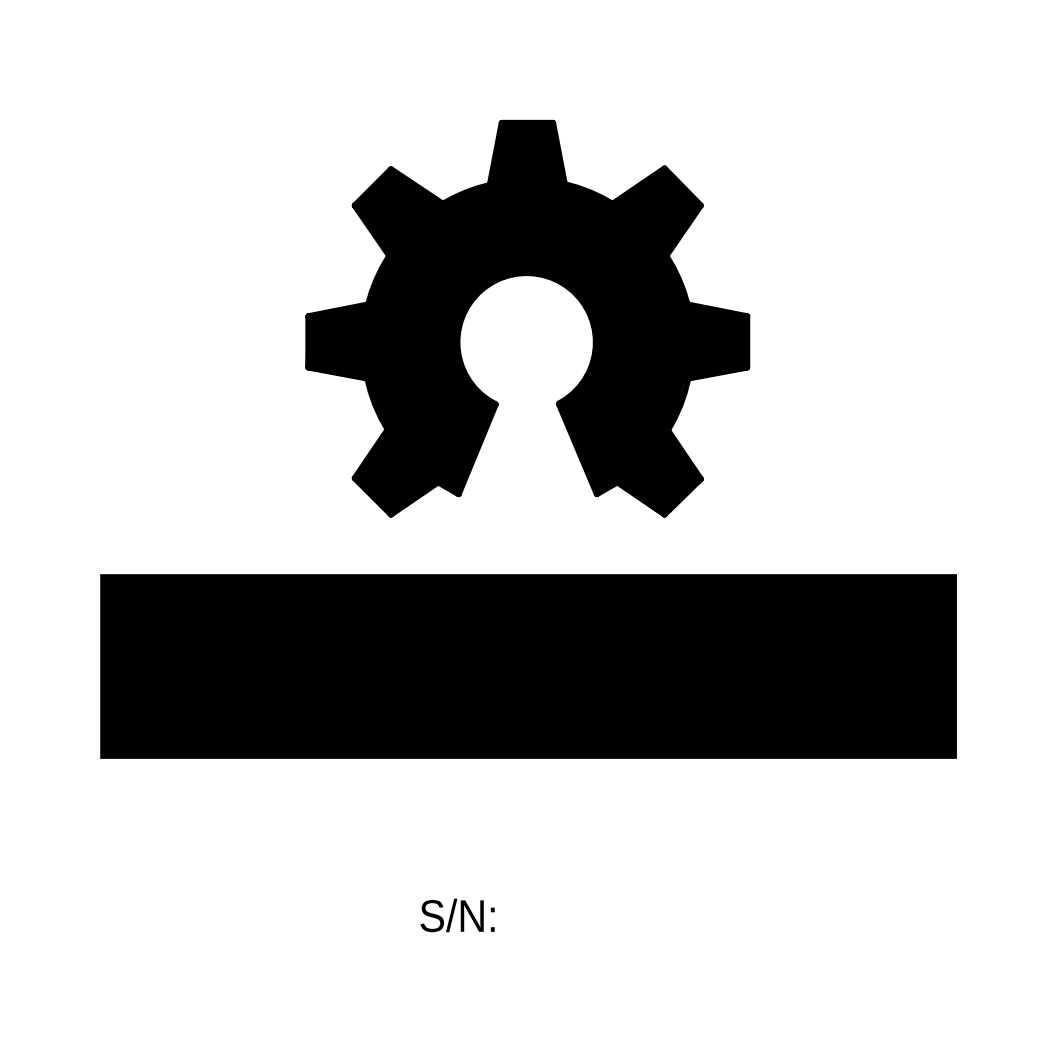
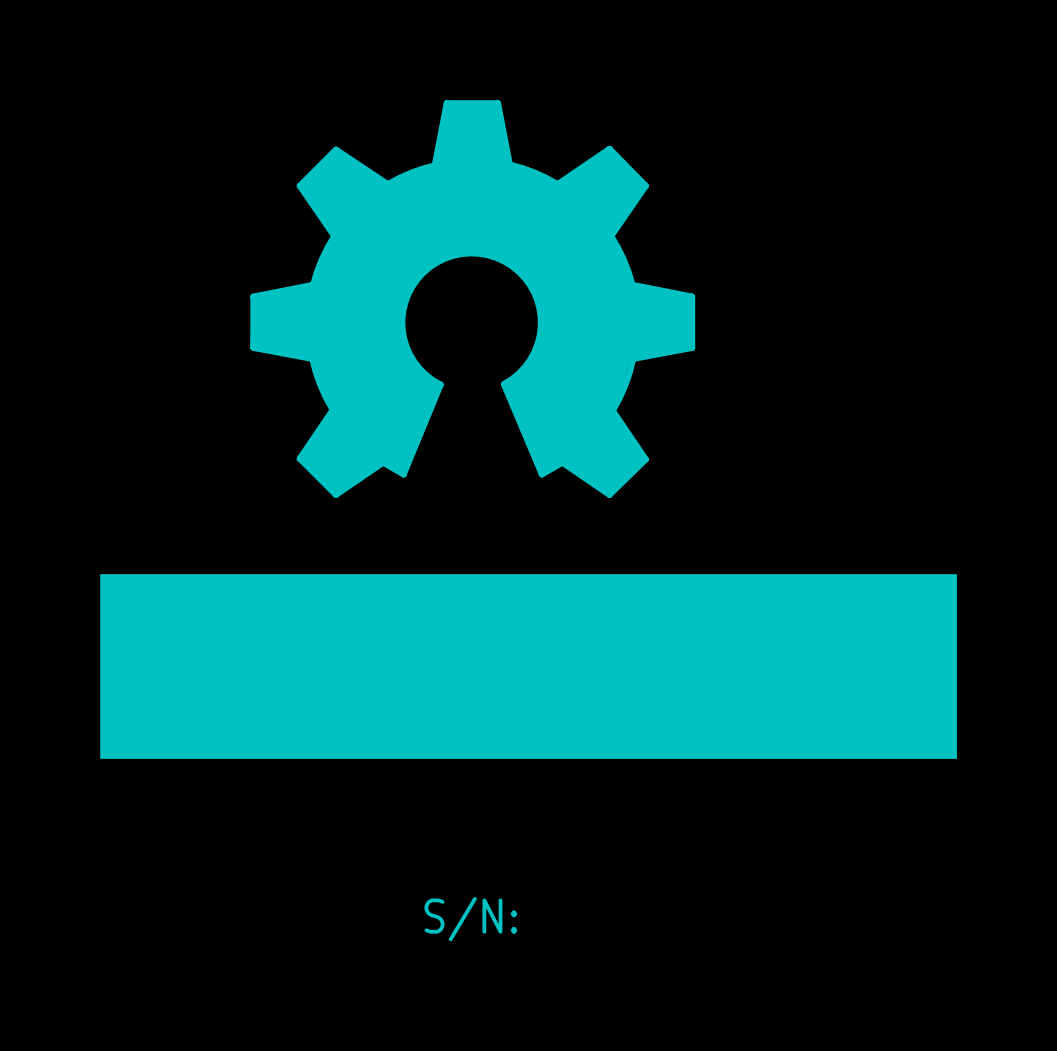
drawing position: (527, 318) -> (472, 299)

